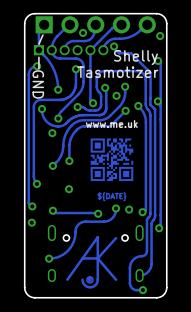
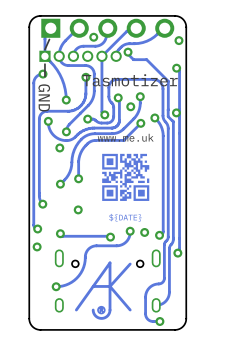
text: Shelly (135, 57) -> none

